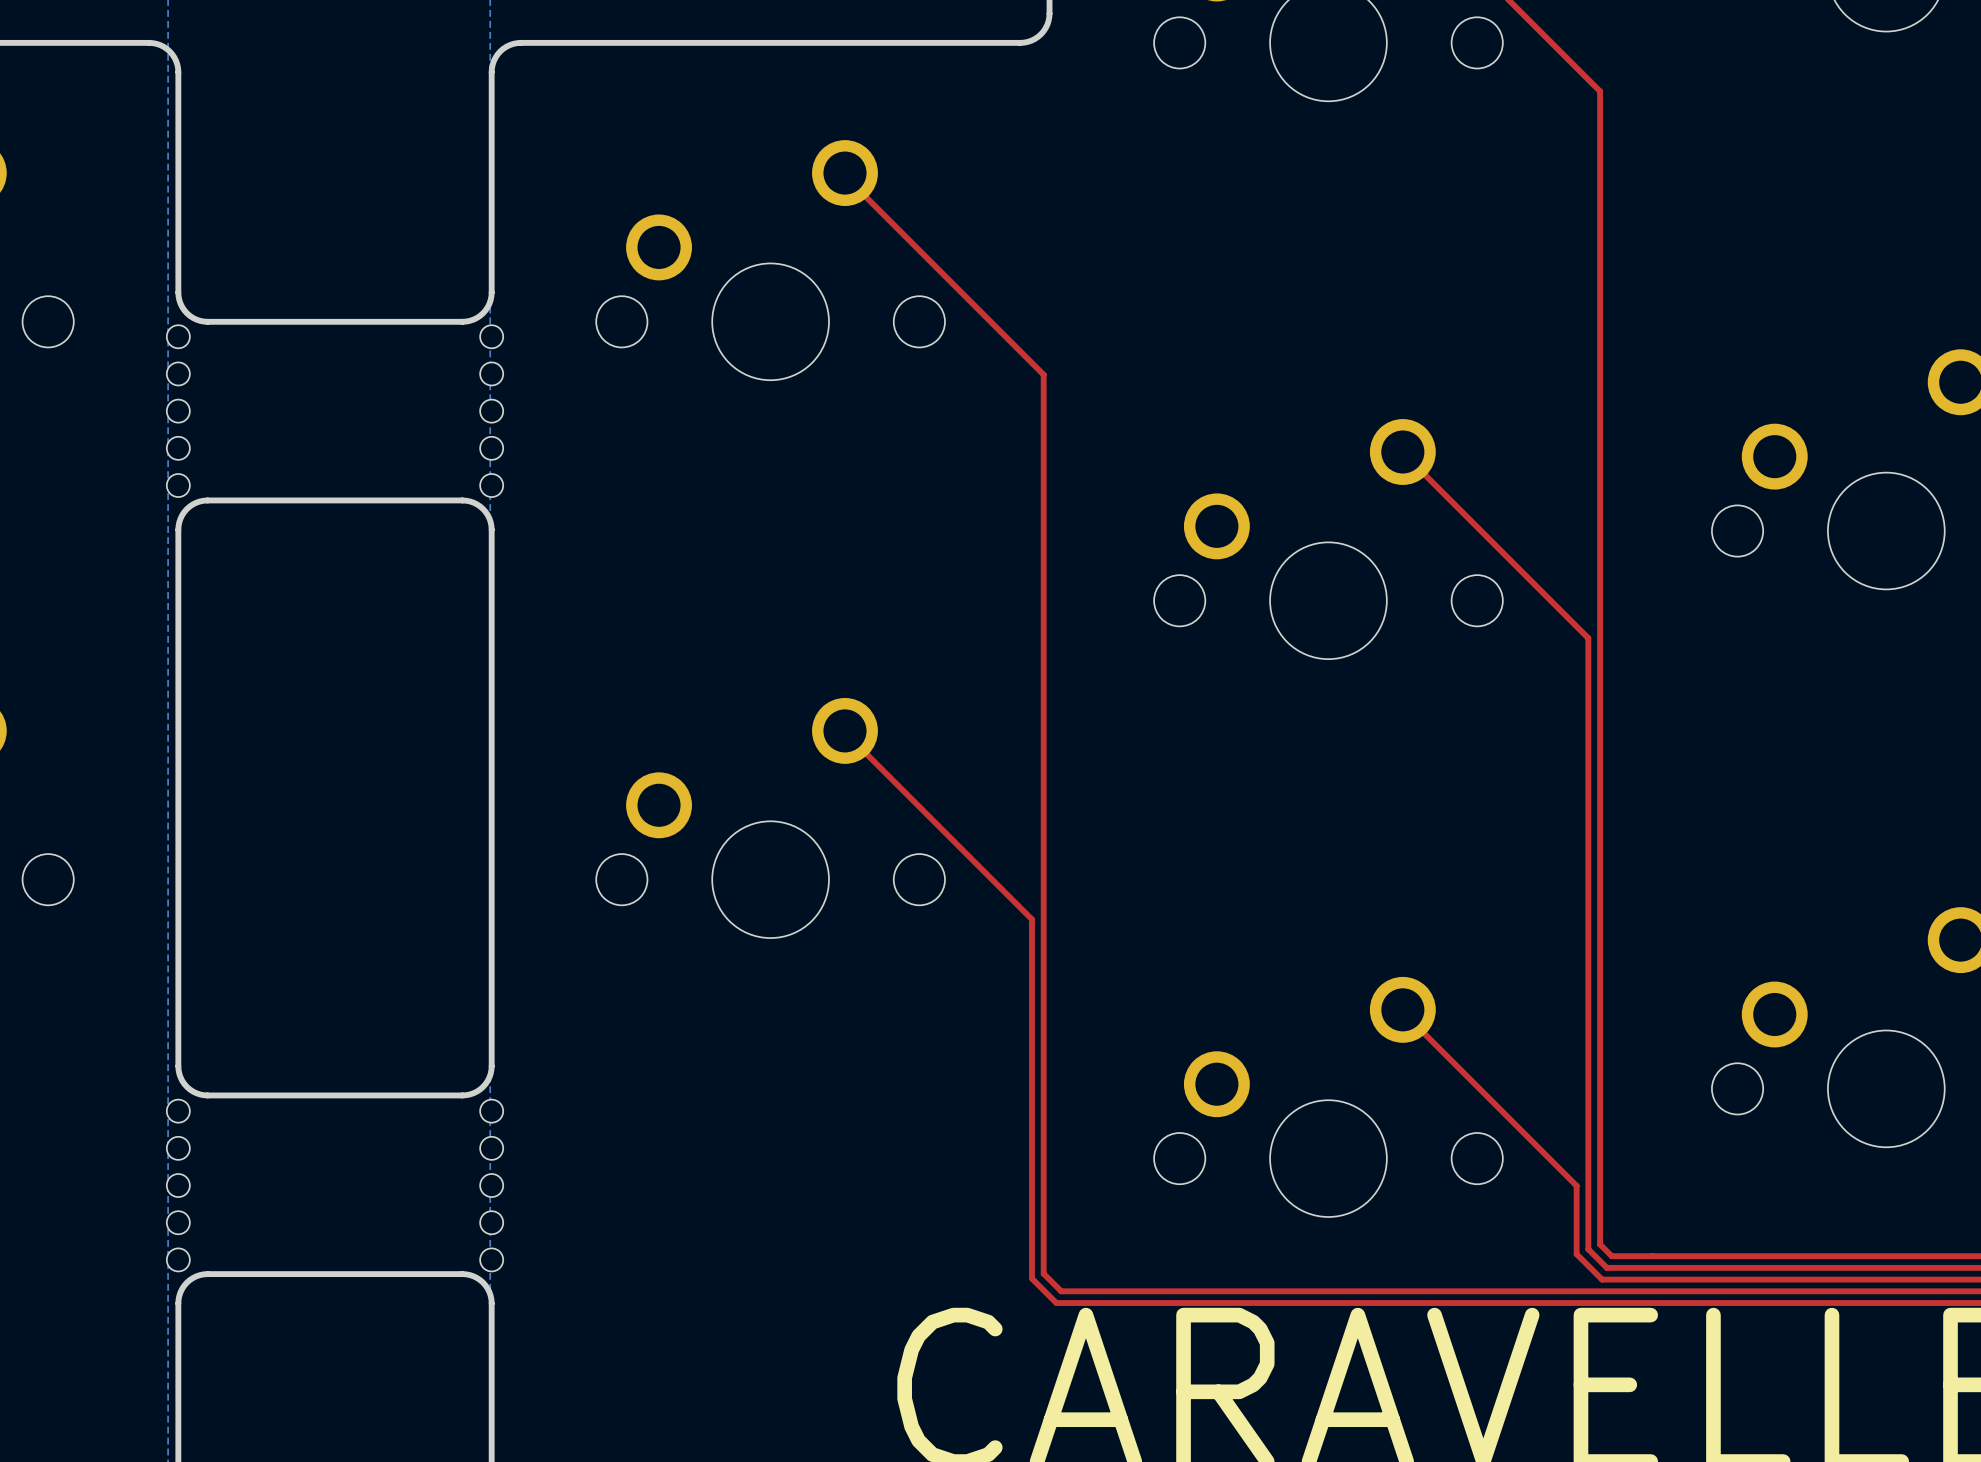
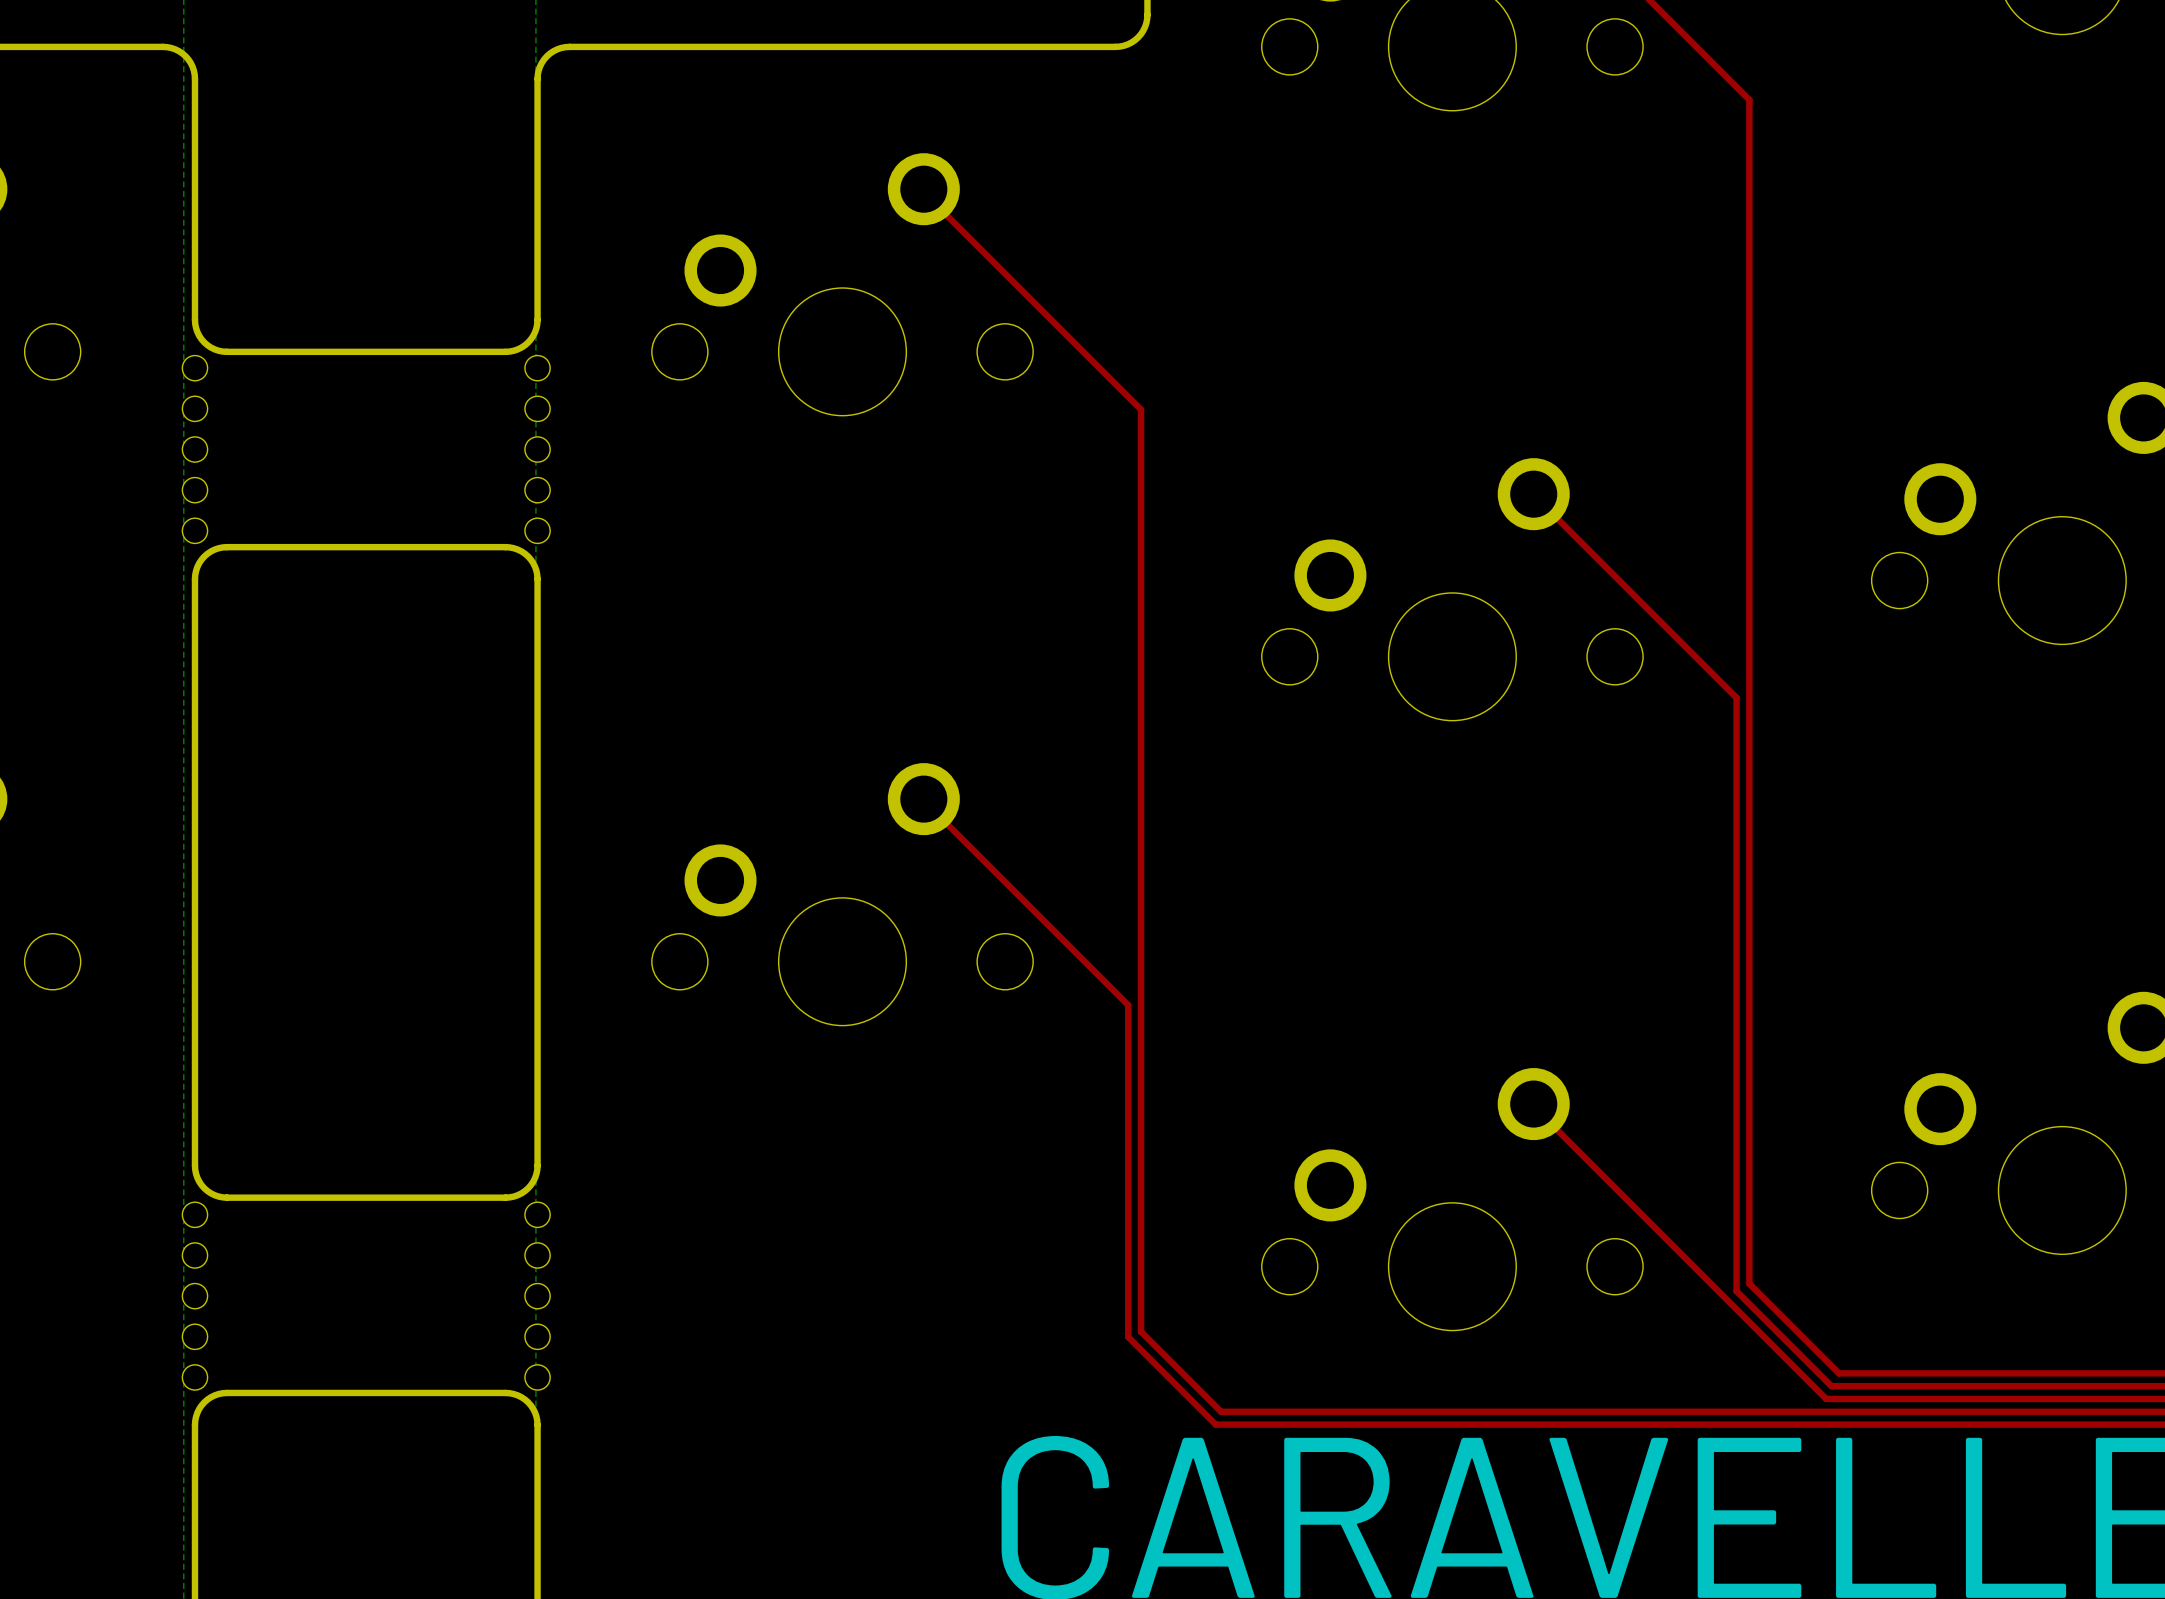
top track: (1600, 1174) (1600, 1244) (1611, 1256) (1682, 1256) -> (1749, 1283) (1839, 1373)
top track: (1588, 1181) (1588, 1249) (1606, 1267) (1675, 1267) -> (1736, 1291) (1831, 1386)
top track: (1576, 1185) (1576, 1254) (1602, 1279) (1670, 1279) -> (1723, 1296) (1826, 1398)
top track: (1043, 1218) (1043, 1273) (1061, 1291) (1116, 1291) -> (1141, 1331) (1221, 1411)
top track: (1031, 1222) (1031, 1278) (1056, 1303) (1112, 1303) -> (1128, 1337) (1215, 1424)

